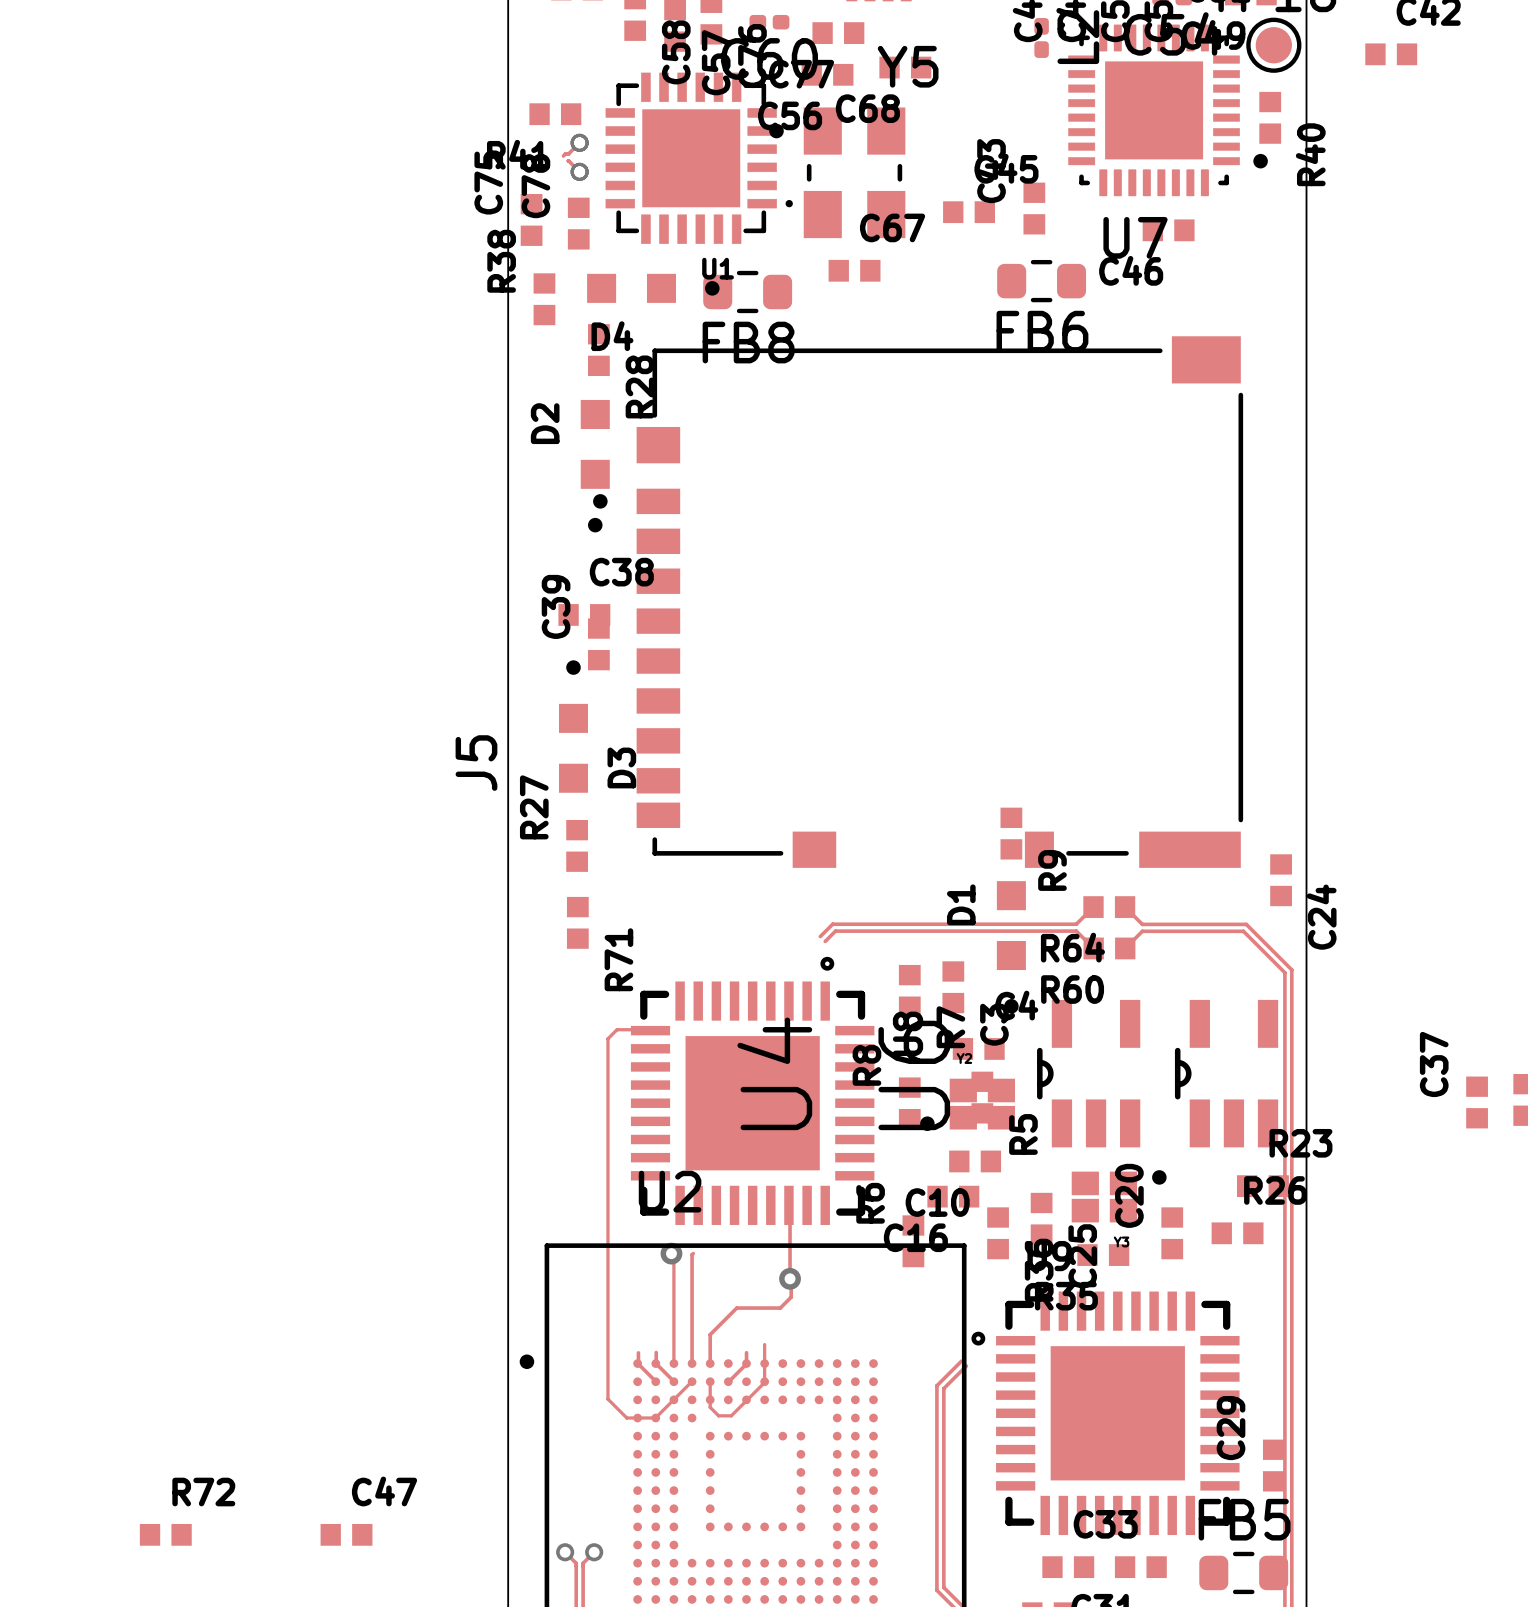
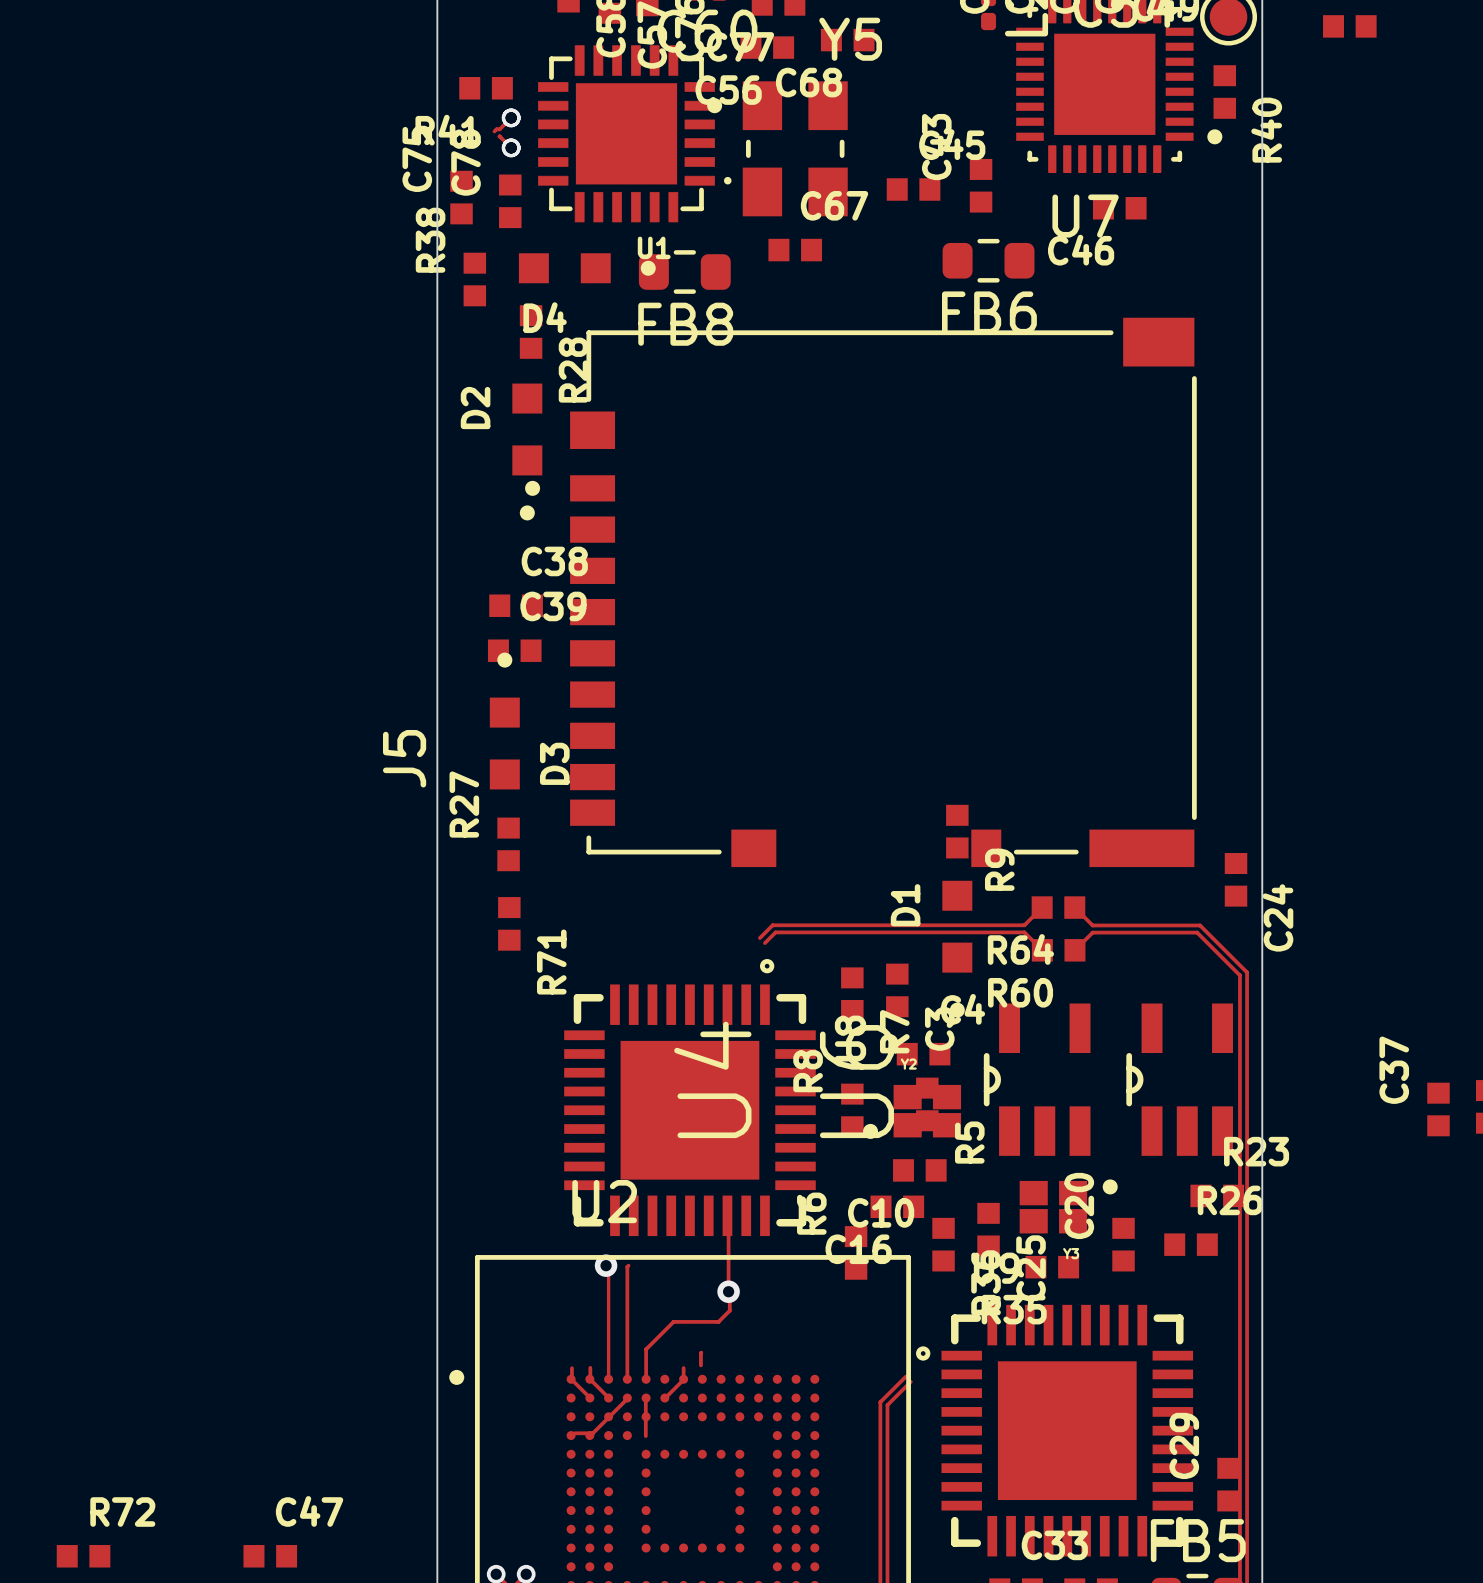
C39 rotation: 0° (598, 644) -> 90° clockwise (514, 650)
track: (650, 1030) (617, 1029) (607, 1038) (607, 1399) (626, 1418) (655, 1418) (691, 1381) -> (574, 1433) (592, 1433) (627, 1398)
track: none -> (700, 1353) (700, 1365)
track: (764, 1344) (764, 1381) -> none
track: (710, 1381) (710, 1407) (718, 1415) (731, 1415) (765, 1381) -> (645, 1398) (645, 1436)

